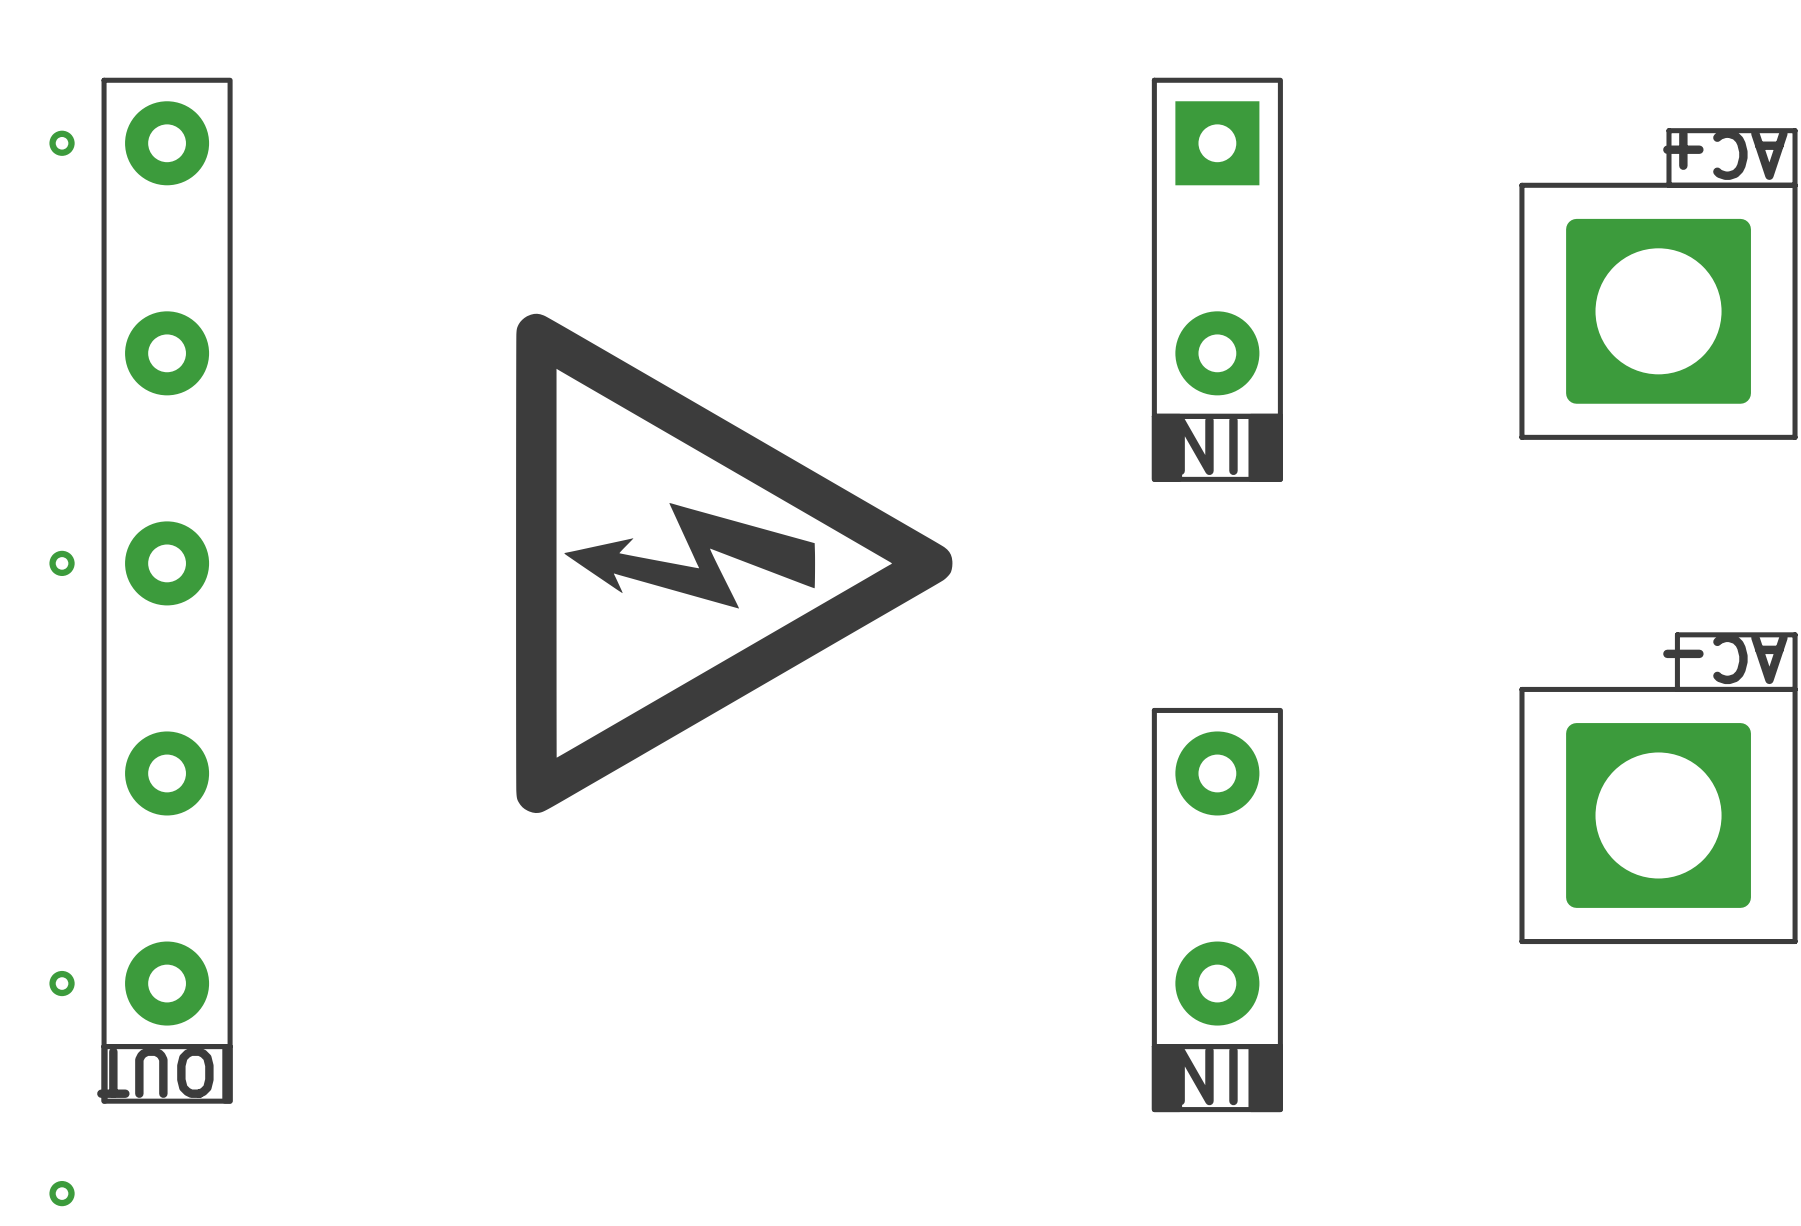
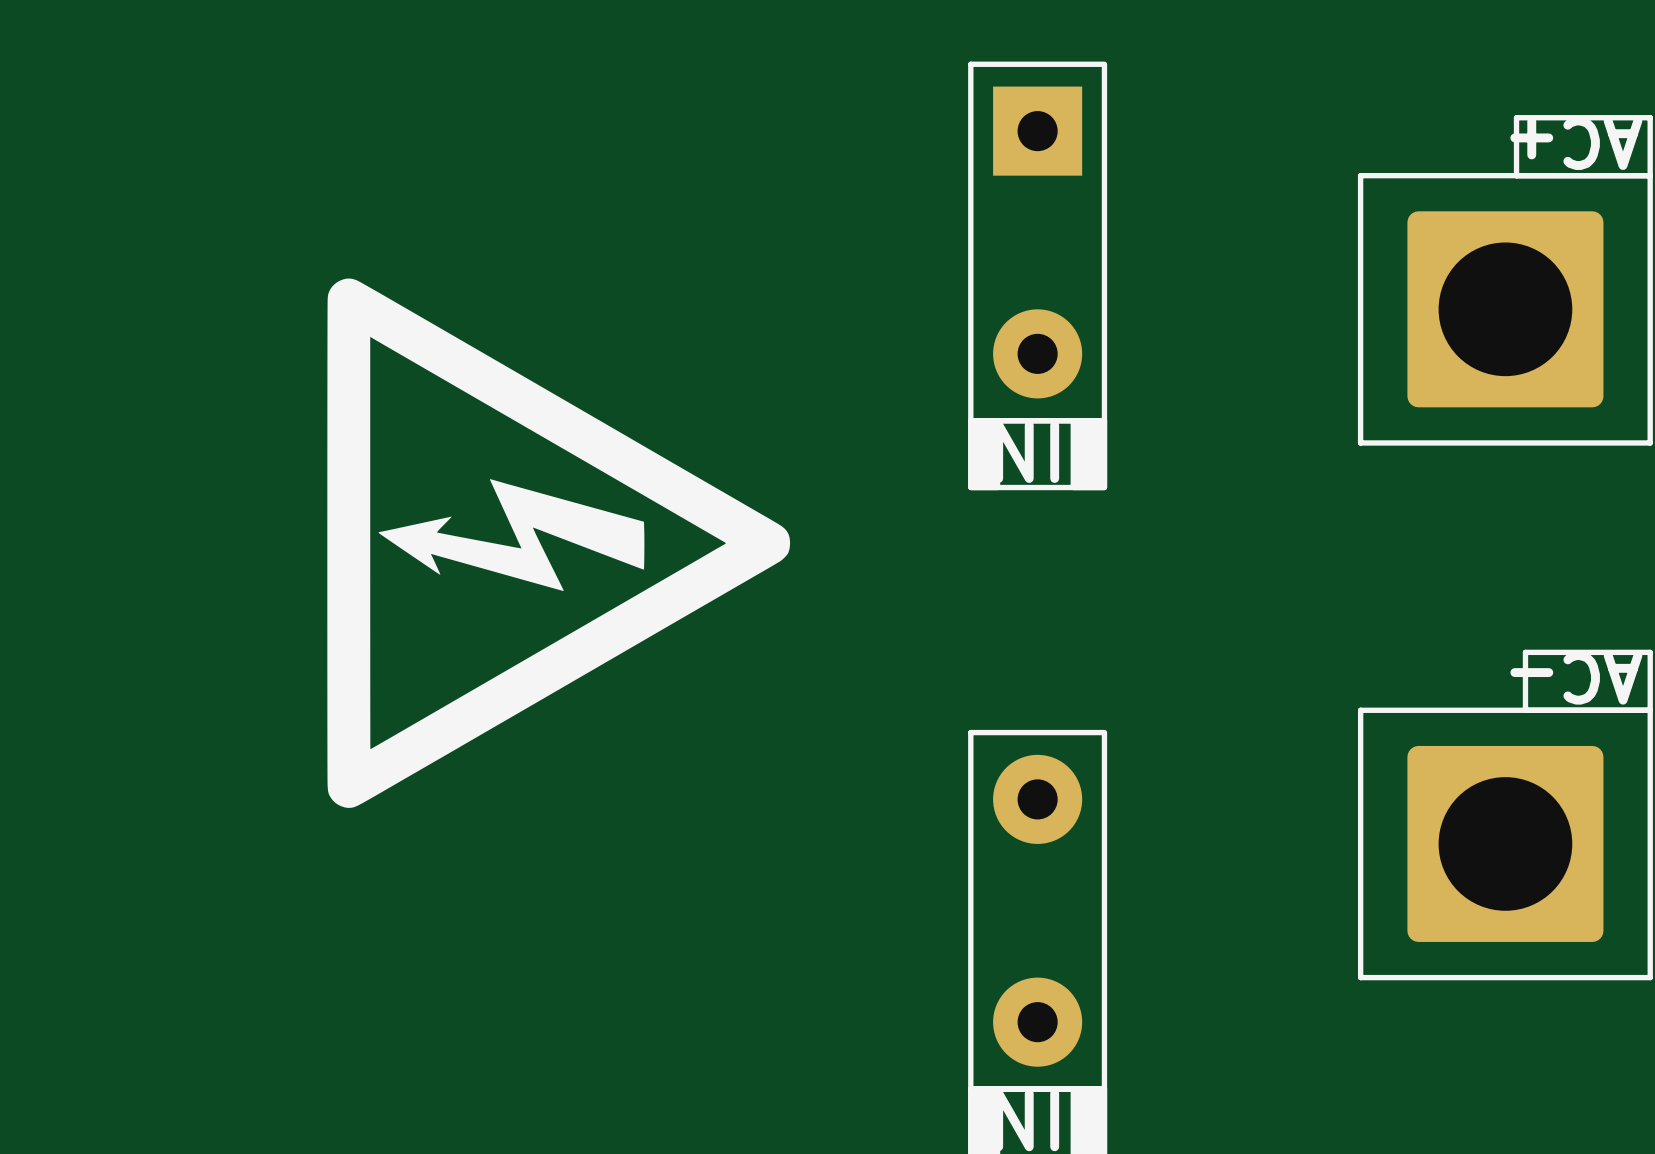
drawing position: (734, 563) -> (558, 543)

